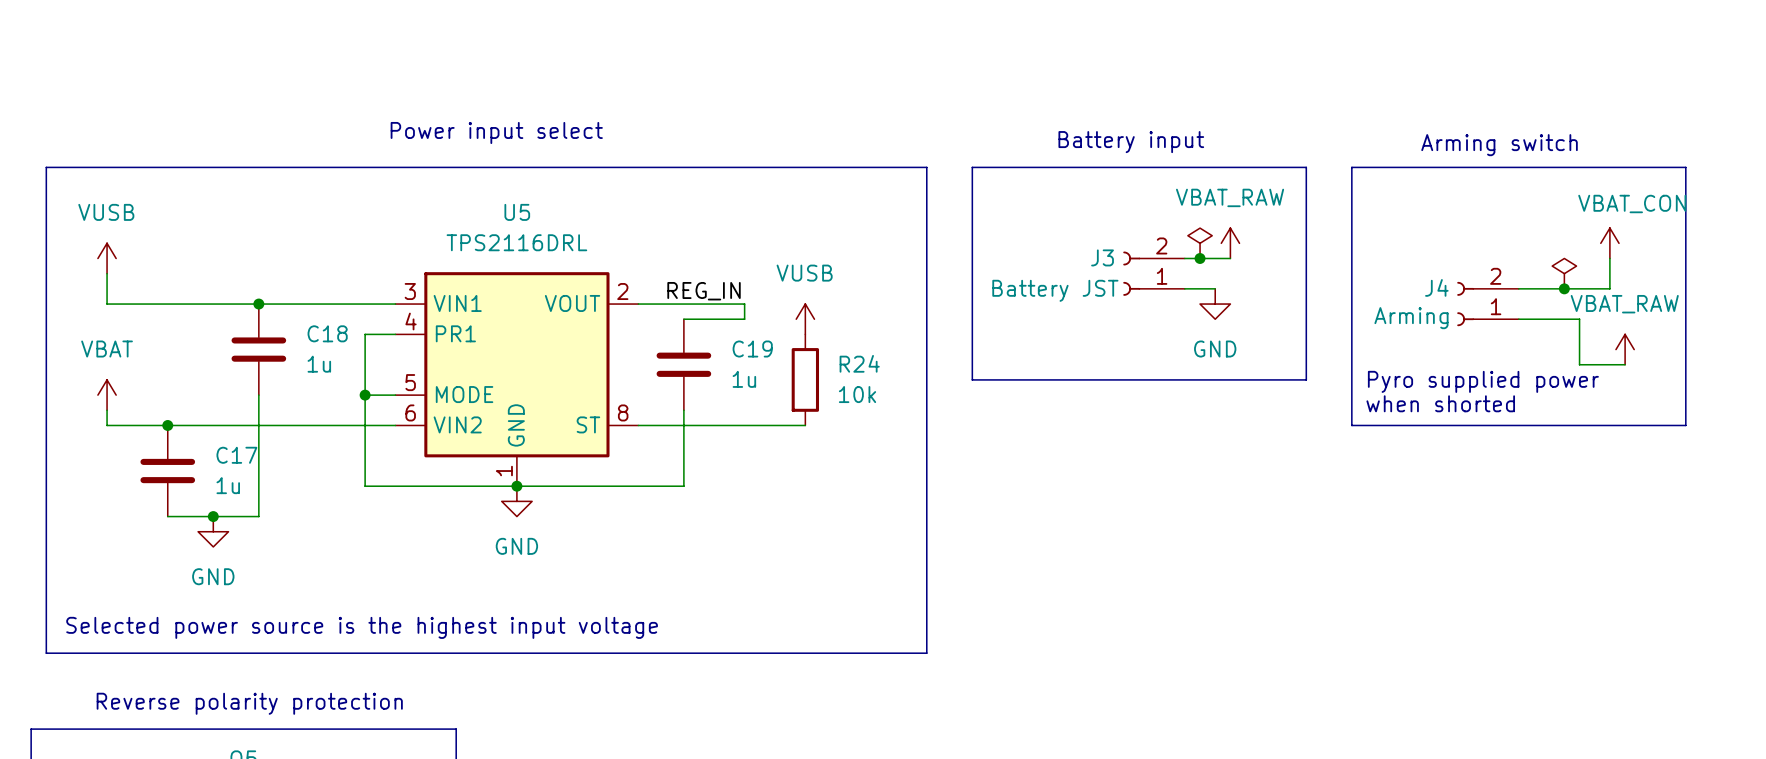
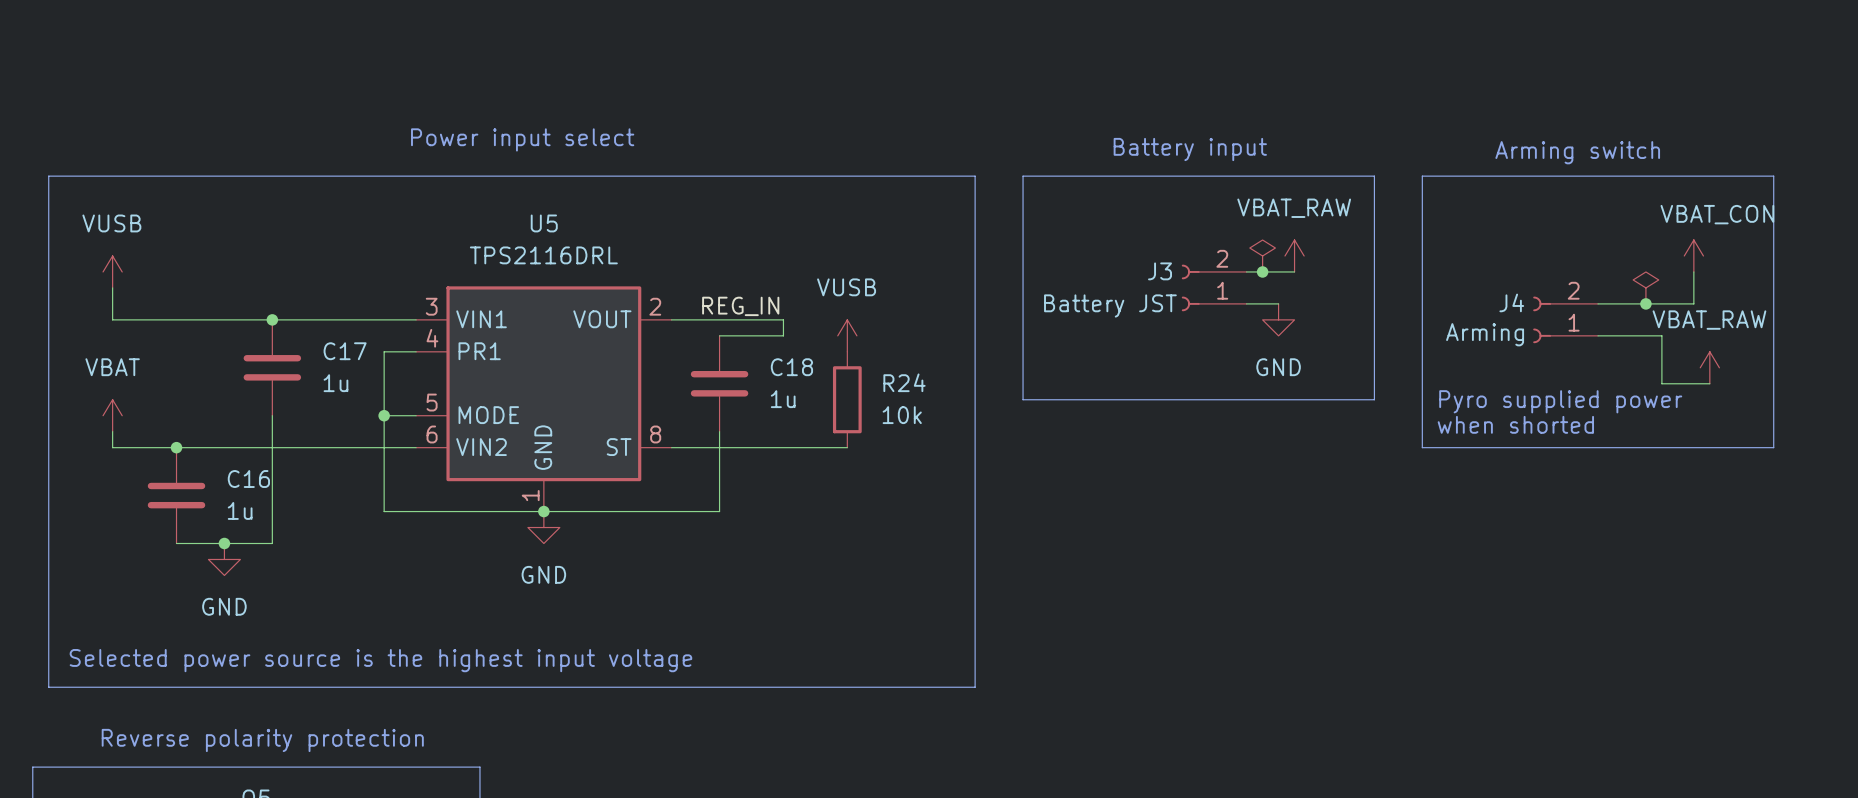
C18 name: C18 (327, 333) -> C17 (345, 351)
C19 name: C19 (752, 349) -> C18 (791, 367)
C17 name: C17 (236, 455) -> C16 (248, 479)

